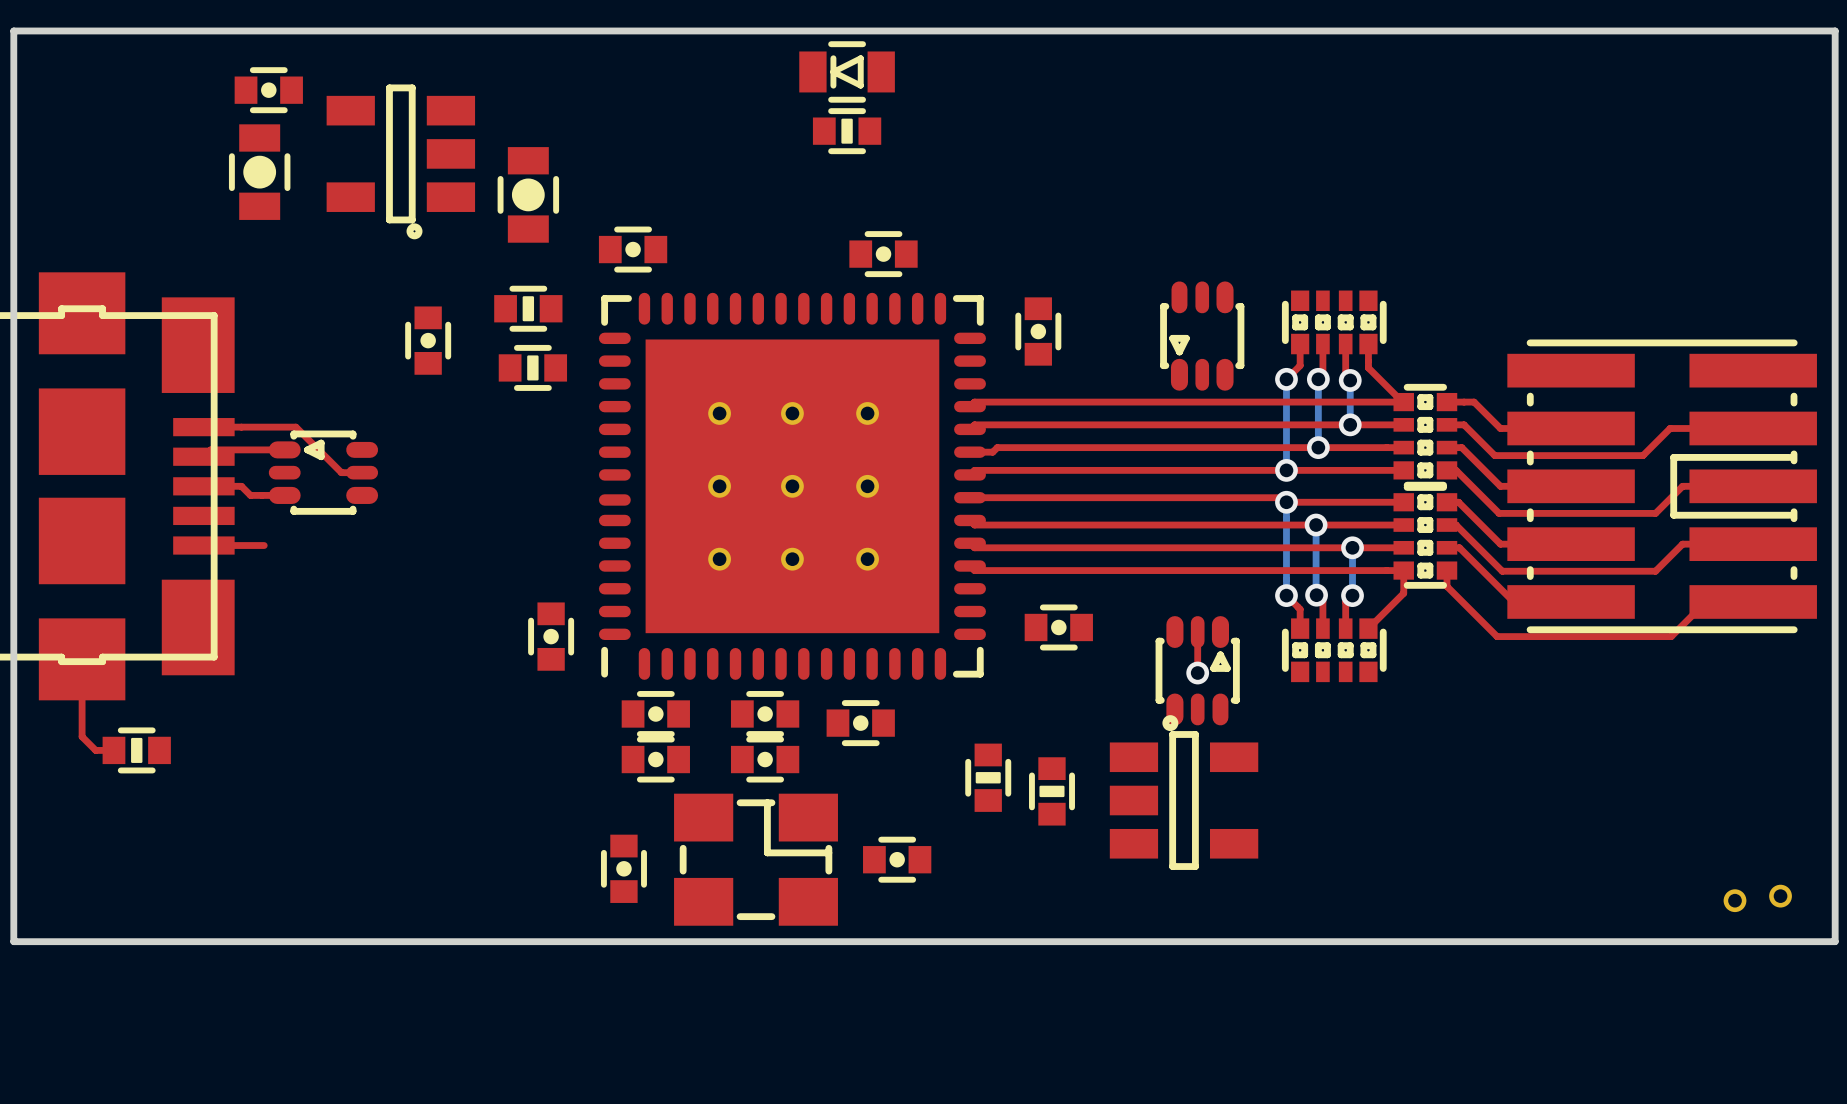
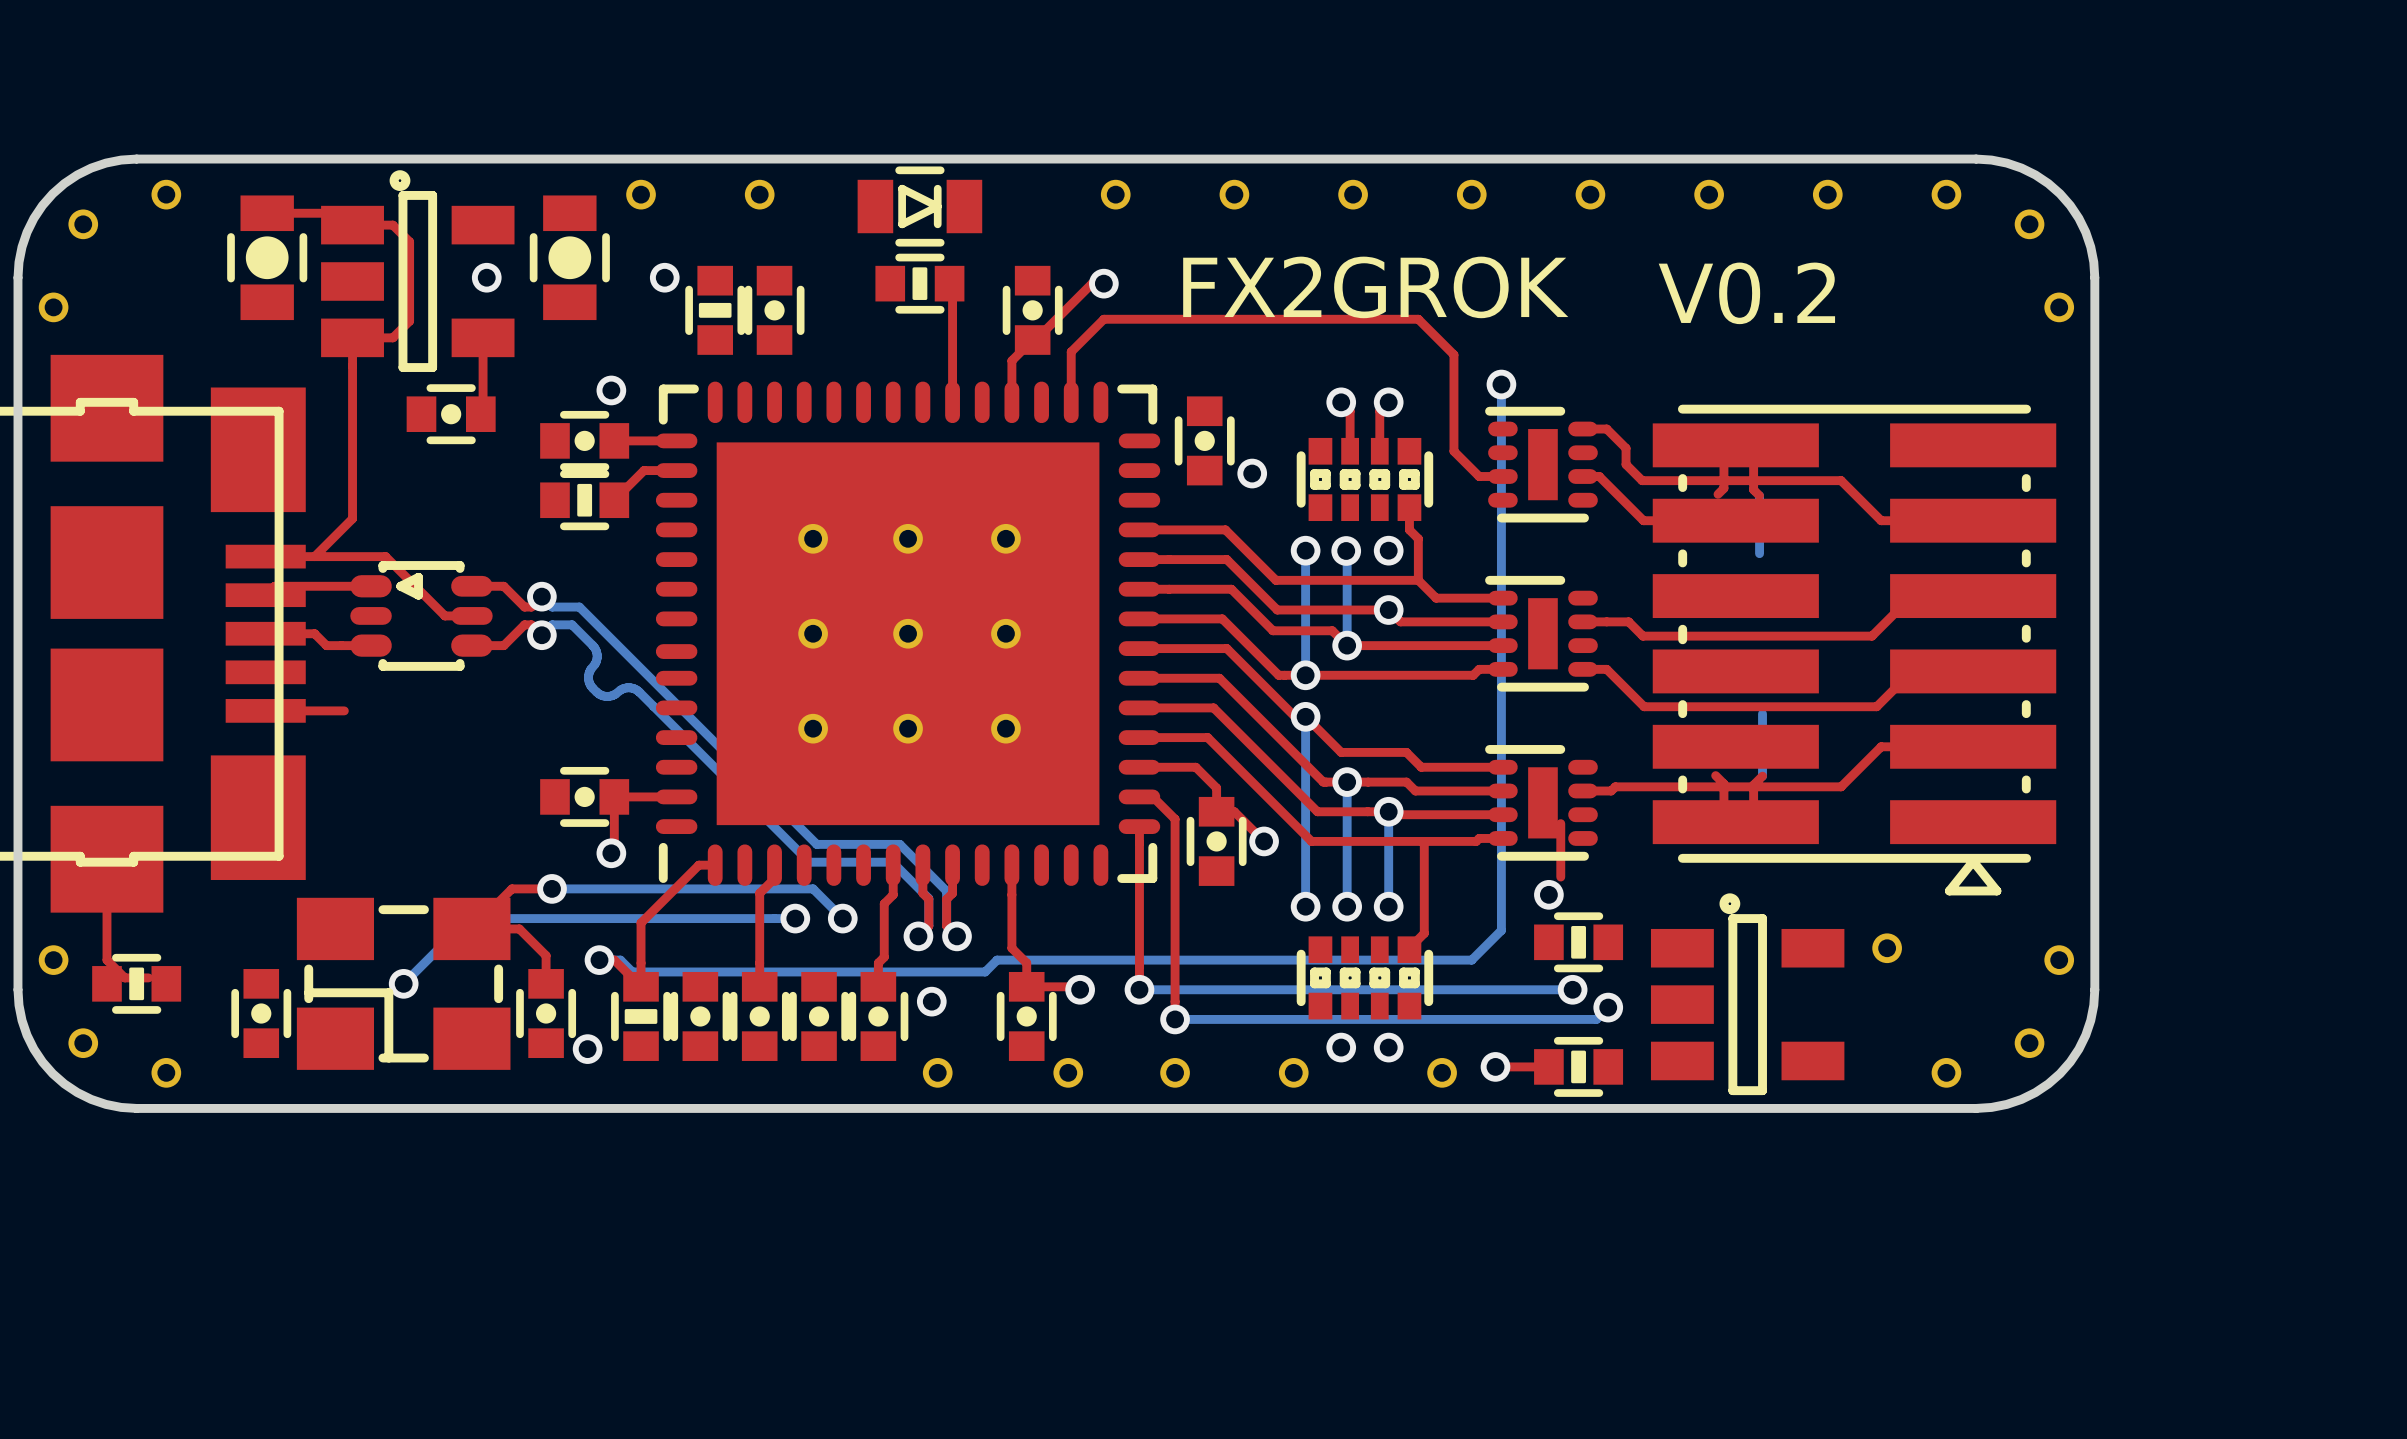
part rotation: 0° (847, 71) -> 180° (919, 206)
part position: (847, 71) -> (919, 206)
part: (268, 90) -> none
part footprint: [812, 108, 882, 155] -> [1100, 179, 1131, 210]
part: none -> (166, 194)
part: none -> (641, 194)
part: none -> (759, 194)
part: none -> (1234, 194)
part: none -> (1353, 194)
part: none -> (1471, 194)
part: none -> (1590, 194)
part: none -> (1709, 194)
part: none -> (1827, 194)
part: none -> (1946, 194)
part rotation: 0° (400, 161) -> 180° (417, 271)
top track: none -> (267, 213) (340, 213) (352, 225) (392, 225) (409, 241) (409, 321) (392, 337) (352, 337) (352, 518) (314, 556)
part: none -> (83, 224)
part position: (259, 172) -> (267, 257)
part: none -> (2029, 224)
part: (528, 194) -> none
part: none -> (569, 257)
board edge: (13, 213) (13, 30) (1835, 30) (1835, 941) (13, 941) (13, 759) -> (17, 277) (19, 262) (27, 232) (33, 218) (52, 193) (77, 174) (91, 168) (121, 160) (136, 159) (1976, 159) (1991, 160) (2021, 168) (2035, 174) (2060, 193) (2070, 205) (2085, 232) (2090, 247) (2094, 277) (2093, 1005) (2085, 1035) (2070, 1062) (2048, 1083) (2021, 1099) (2006, 1104) (1976, 1108) (136, 1108) (105, 1104) (91, 1099) (64, 1083) (52, 1073) (33, 1049) (27, 1035) (19, 1005) (17, 989)
via: none -> (486, 277)
via: none -> (664, 277)
part: none -> (919, 283)
top track: none -> (949, 283) (952, 286) (952, 402)
top track: none -> (1103, 283) (1092, 283) (1035, 340) (1032, 340) (1011, 360) (1011, 402)
via: none -> (1103, 283)
text: none -> FX2GROK (1375, 287)
text: none -> V0.2 (1746, 293)
part: none -> (53, 307)
part: none -> (2059, 307)
part: none -> (715, 310)
part: none -> (1032, 310)
part rotation: 0° (633, 249) -> 90° clockwise (774, 310)
part: (883, 254) -> none
top track: none -> (483, 337) (483, 411) (480, 414)
part footprint: [1160, 281, 1245, 391] -> [1485, 406, 1598, 523]
bottom track: none -> (1501, 384) (1501, 930) (1471, 960) (997, 960) (985, 971) (632, 971) (620, 960) (599, 960)
via: none -> (1501, 384)
part footprint: [1015, 297, 1062, 366] -> [1296, 437, 1434, 522]
via: none -> (611, 390)
part: (528, 308) -> none
top track: none -> (1071, 402) (1071, 351) (1103, 319) (1418, 319) (1453, 354) (1453, 451) (1479, 476) (1502, 476)
top track: none -> (1341, 402) (1350, 411) (1350, 451)
via: none -> (1341, 402)
top track: none -> (1388, 402) (1379, 411) (1379, 451)
via: none -> (1388, 402)
part: none -> (451, 414)
part: (1334, 322) -> none
top track: none -> (1583, 429) (1606, 429) (1626, 448) (1626, 464) (1642, 480) (1841, 480) (1881, 520) (1973, 520)
top track: none -> (614, 440) (676, 440)
part: none -> (1204, 440)
part rotation: 0° (428, 340) -> 90° clockwise (584, 440)
top track: (1300, 344) (1300, 365) (1286, 379) -> none
top track: (1368, 344) (1368, 367) (1402, 402) -> none
top track: none -> (676, 470) (644, 470) (614, 500)
via: none -> (1252, 473)
top track: none -> (1583, 476) (1599, 476) (1643, 520) (1735, 520)
part: (532, 367) -> none
bottom track: (1286, 379) (1286, 470) -> none
via: (1286, 379) -> none
bottom track: (1318, 379) (1318, 447) -> none
via: (1318, 379) -> none
via: (1350, 380) -> none
part: none -> (584, 500)
top track: none -> (1409, 507) (1409, 529) (1418, 538) (1418, 580)
top track: (1403, 402) (974, 402) (970, 406) -> none
top track: (1447, 402) (1474, 402) (1500, 428) (1571, 428) -> none
top track: none -> (1139, 529) (1225, 529) (1275, 580) (1418, 580)
bottom track: none -> (1305, 550) (1305, 675)
via: none -> (1305, 550)
bottom track: none -> (1346, 550) (1347, 645)
via: none -> (1346, 550)
via: none -> (1388, 550)
via: (1350, 424) -> none
top track: (1403, 424) (974, 424) (970, 429) -> none
top track: (1447, 424) (1464, 424) (1494, 455) (1643, 455) (1670, 428) (1753, 428) -> none
top track: none -> (1139, 559) (1226, 559) (1277, 610) (1388, 610) (1400, 621) (1502, 621)
part: (1425, 436) -> none
top track: none -> (1418, 580) (1436, 598) (1502, 598)
via: (1318, 447) -> none
top track: (1403, 447) (997, 447) (992, 452) (970, 452) -> none
top track: (1447, 447) (1461, 447) (1500, 486) (1571, 486) -> none
top track: none -> (471, 586) (503, 586) (524, 607) (531, 607) (541, 596)
top track: none -> (1139, 589) (1231, 589) (1272, 630) (1332, 630) (1347, 645) (1502, 645)
bottom track: none -> (541, 596) (552, 607) (579, 607) (816, 844) (899, 844) (946, 891) (946, 925) (957, 936)
via: none -> (541, 596)
top track: none -> (1973, 596) (1912, 596) (1871, 636) (1642, 636) (1628, 621) (1583, 621)
via: none -> (1388, 610)
via: (1286, 470) -> none
top track: (1403, 470) (974, 470) (970, 474) -> none
top track: (1447, 470) (1456, 470) (1499, 513) (1655, 513) (1682, 486) (1753, 486) -> none
top track: none -> (1139, 618) (1222, 618) (1278, 675) (1473, 675) (1479, 669) (1502, 669)
part position: (792, 486) -> (908, 633)
part: none -> (1541, 633)
part: (1662, 486) -> none
top track: none -> (541, 635) (531, 624) (524, 624) (503, 645) (471, 645)
bottom track: none -> (541, 635) (552, 624) (572, 624) (596, 651) (596, 661) (589, 672) (588, 679) (590, 685) (596, 692) (609, 696) (626, 687) (639, 692) (809, 862) (892, 862) (928, 898) (928, 925) (918, 936)
via: none -> (541, 635)
via: none -> (1347, 645)
top track: none -> (1139, 648) (1226, 648) (1295, 716) (1305, 716) (1341, 752) (1406, 752) (1421, 767) (1502, 767)
top track: (970, 497) (1281, 497) (1286, 502) (1403, 502) -> none
part: none -> (1854, 650)
bottom track: (1286, 502) (1286, 595) -> none
via: (1286, 502) -> none
top track: (1447, 502) (1458, 502) (1500, 544) (1571, 544) -> none
top track: none -> (1583, 669) (1606, 669) (1644, 706) (1876, 706) (1912, 671) (1973, 671)
via: none -> (1305, 675)
top track: none -> (1139, 678) (1219, 678) (1323, 782) (1406, 782) (1415, 790) (1502, 790)
top track: (970, 520) (974, 525) (1403, 525) -> none
bottom track: (1316, 525) (1316, 594) -> none
via: (1316, 525) -> none
top track: (1456, 525) (1502, 571) (1655, 571) (1682, 544) (1753, 544) -> none
part: (1425, 536) -> none
top track: none -> (1139, 707) (1213, 707) (1317, 811) (1388, 811) (1391, 814) (1502, 814)
top track: (970, 543) (974, 547) (1403, 547) -> none
via: (1352, 547) -> none
bottom track: none -> (1305, 716) (1305, 906)
via: none -> (1305, 716)
top track: (1449, 550) (1447, 547) (1459, 547) (1513, 601) (1571, 601) -> none
top track: none -> (1139, 737) (1207, 737) (1311, 841) (1476, 841) (1479, 838) (1502, 838)
top track: (970, 566) (974, 570) (1403, 570) (1403, 593) (1368, 628) -> none
top track: (1447, 570) (1447, 586) (1497, 636) (1671, 636) (1705, 601) (1753, 601) -> none
top track: none -> (1973, 746) (1881, 746) (1841, 786) (1615, 786) (1611, 790) (1583, 790)
top track: none -> (1139, 767) (1195, 767) (1216, 788) (1216, 811) (1234, 811) (1264, 841)
top track: (1286, 595) (1300, 609) (1300, 628) -> none
via: (1286, 595) -> none
via: (1316, 595) -> none
via: (1352, 595) -> none
bottom track: none -> (1347, 782) (1347, 906)
via: none -> (1347, 782)
part: none -> (584, 796)
top track: none -> (676, 796) (614, 796) (614, 850) (611, 853)
top track: none -> (1139, 796) (1152, 796) (1175, 819) (1175, 1019)
part: none -> (1541, 802)
bottom track: none -> (1388, 811) (1388, 906)
via: none -> (1388, 811)
part: (1058, 627) -> none
top track: none -> (1139, 826) (1139, 989)
part: (551, 636) -> none
part: none -> (1216, 841)
via: none -> (1264, 841)
top track: none -> (1424, 841) (1424, 933) (1409, 949)
part: (1334, 650) -> none
via: none -> (611, 853)
top track: none -> (715, 865) (698, 865) (641, 923) (641, 986) (614, 960) (599, 960)
top track: none -> (774, 865) (774, 878) (759, 893) (759, 986)
top track: none -> (893, 865) (893, 894) (884, 903) (884, 957) (878, 963) (878, 986)
top track: none -> (922, 865) (922, 893) (928, 899) (928, 925) (918, 936)
top track: none -> (952, 865) (952, 893) (946, 899) (946, 925) (957, 936)
top track: none -> (1011, 865) (1011, 948) (1026, 963) (1026, 986) (1077, 986) (1080, 989)
part: (1197, 670) -> none
via position: (1197, 673) -> (1548, 894)
top track: none -> (552, 888) (511, 888) (471, 928) (519, 928) (546, 955) (546, 983)
bottom track: none -> (552, 888) (813, 888) (842, 918)
via: none -> (552, 888)
via: none -> (1305, 906)
via: none -> (1347, 906)
via: none -> (1388, 906)
bottom track: none -> (795, 918) (468, 918) (403, 983)
via: none -> (795, 918)
via: none -> (842, 918)
part: (655, 713) -> none
part: (765, 713) -> none
via: none -> (918, 936)
via: none -> (957, 936)
part: (860, 723) -> none
part: none -> (1578, 942)
part: none -> (1887, 948)
part: none -> (53, 960)
via: none -> (599, 960)
part: none -> (2059, 960)
part position: (136, 750) -> (136, 983)
part: none -> (1364, 977)
via: none -> (403, 983)
part: (655, 759) -> none
part rotation: 0° (765, 759) -> 90° clockwise (1026, 1016)
via: none -> (1080, 989)
bottom track: none -> (1139, 989) (1572, 989)
via: none -> (1139, 989)
via: none -> (1572, 989)
via: none -> (931, 1001)
bottom track: none -> (1608, 1007) (1596, 1019) (1175, 1019)
via: none -> (1608, 1007)
part: none -> (261, 1013)
part: none -> (546, 1013)
part: (988, 777) -> none
part: none -> (641, 1016)
part: none -> (700, 1016)
part: none -> (759, 1016)
part: none -> (819, 1016)
part: none -> (878, 1016)
via: none -> (1175, 1019)
part: (1051, 791) -> none
part position: (1184, 792) -> (1747, 994)
part: none -> (83, 1043)
part: none -> (2029, 1043)
via: none -> (1341, 1047)
via: none -> (1388, 1047)
via: none -> (587, 1049)
top track: none -> (1495, 1066) (1548, 1066)
via: none -> (1495, 1066)
part: none -> (1578, 1066)
part: none -> (166, 1072)
part: none -> (937, 1072)
part: none -> (1068, 1072)
part: none -> (1293, 1072)
part: none -> (1442, 1072)
part: none -> (1946, 1072)
part footprint: [863, 836, 932, 883] -> [1160, 1058, 1190, 1088]
part rotation: 0° (756, 859) -> 180° (403, 983)
part position: (756, 859) -> (403, 983)
part: (623, 868) -> none
part: (1780, 896) -> none
part: (1735, 900) -> none

